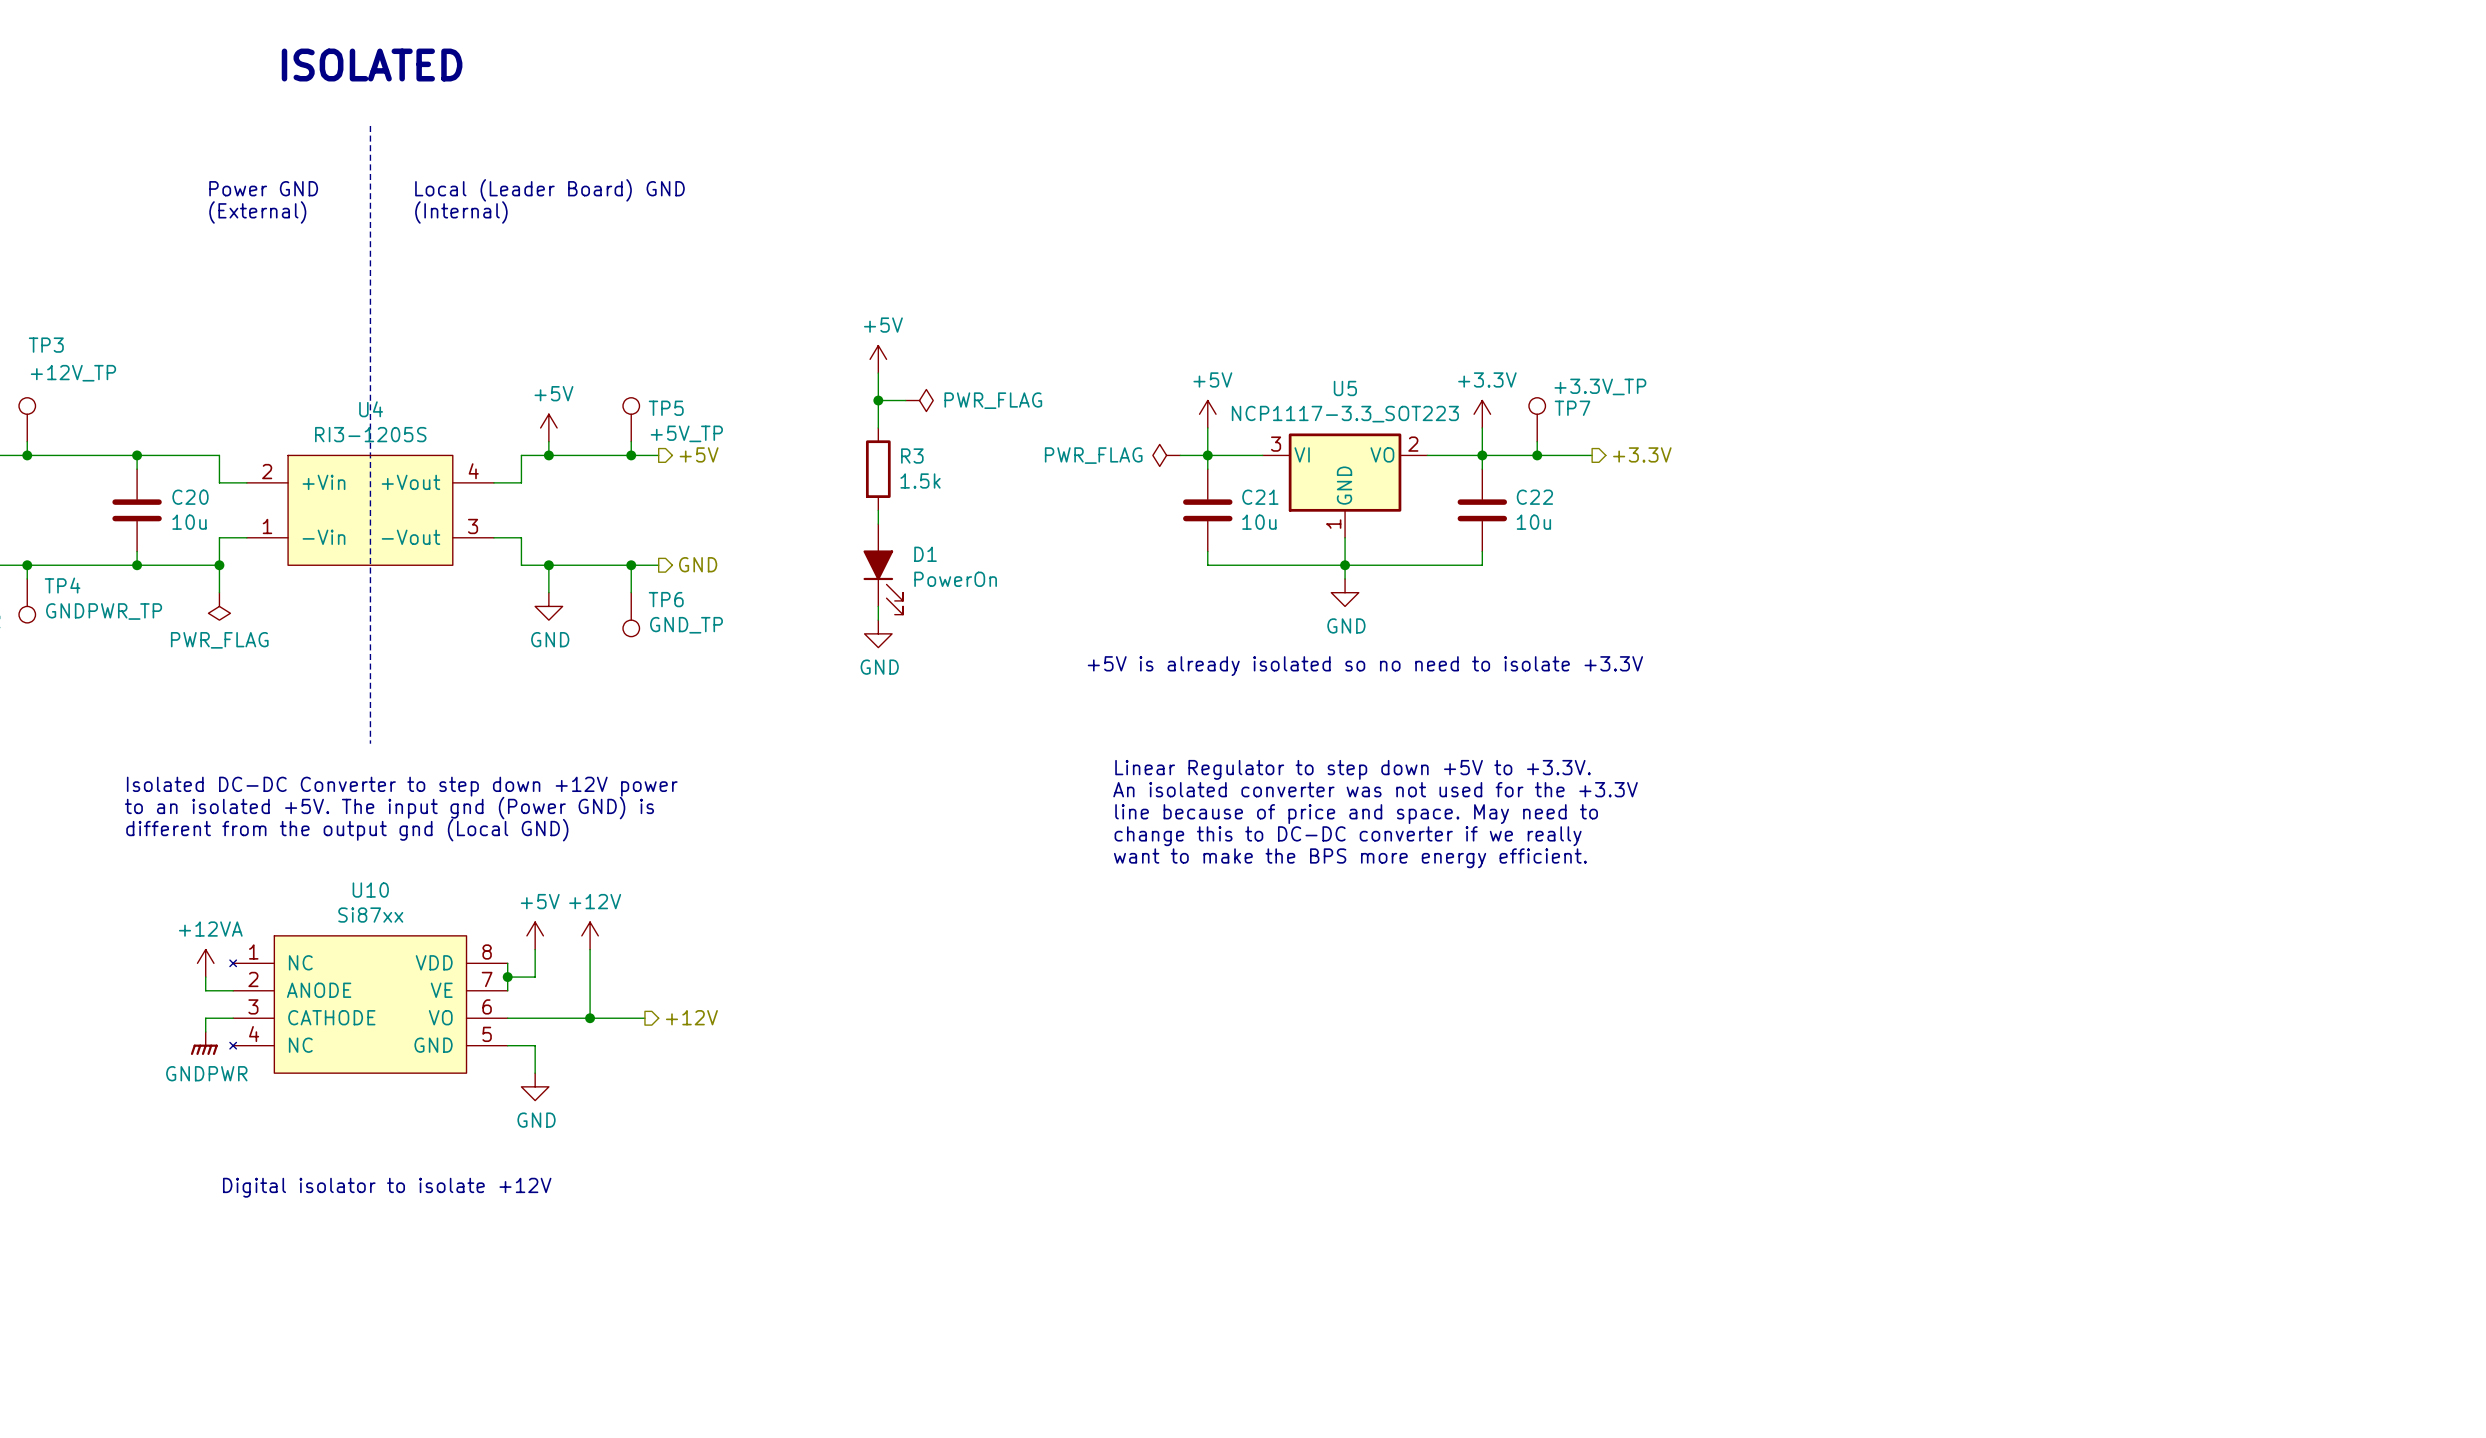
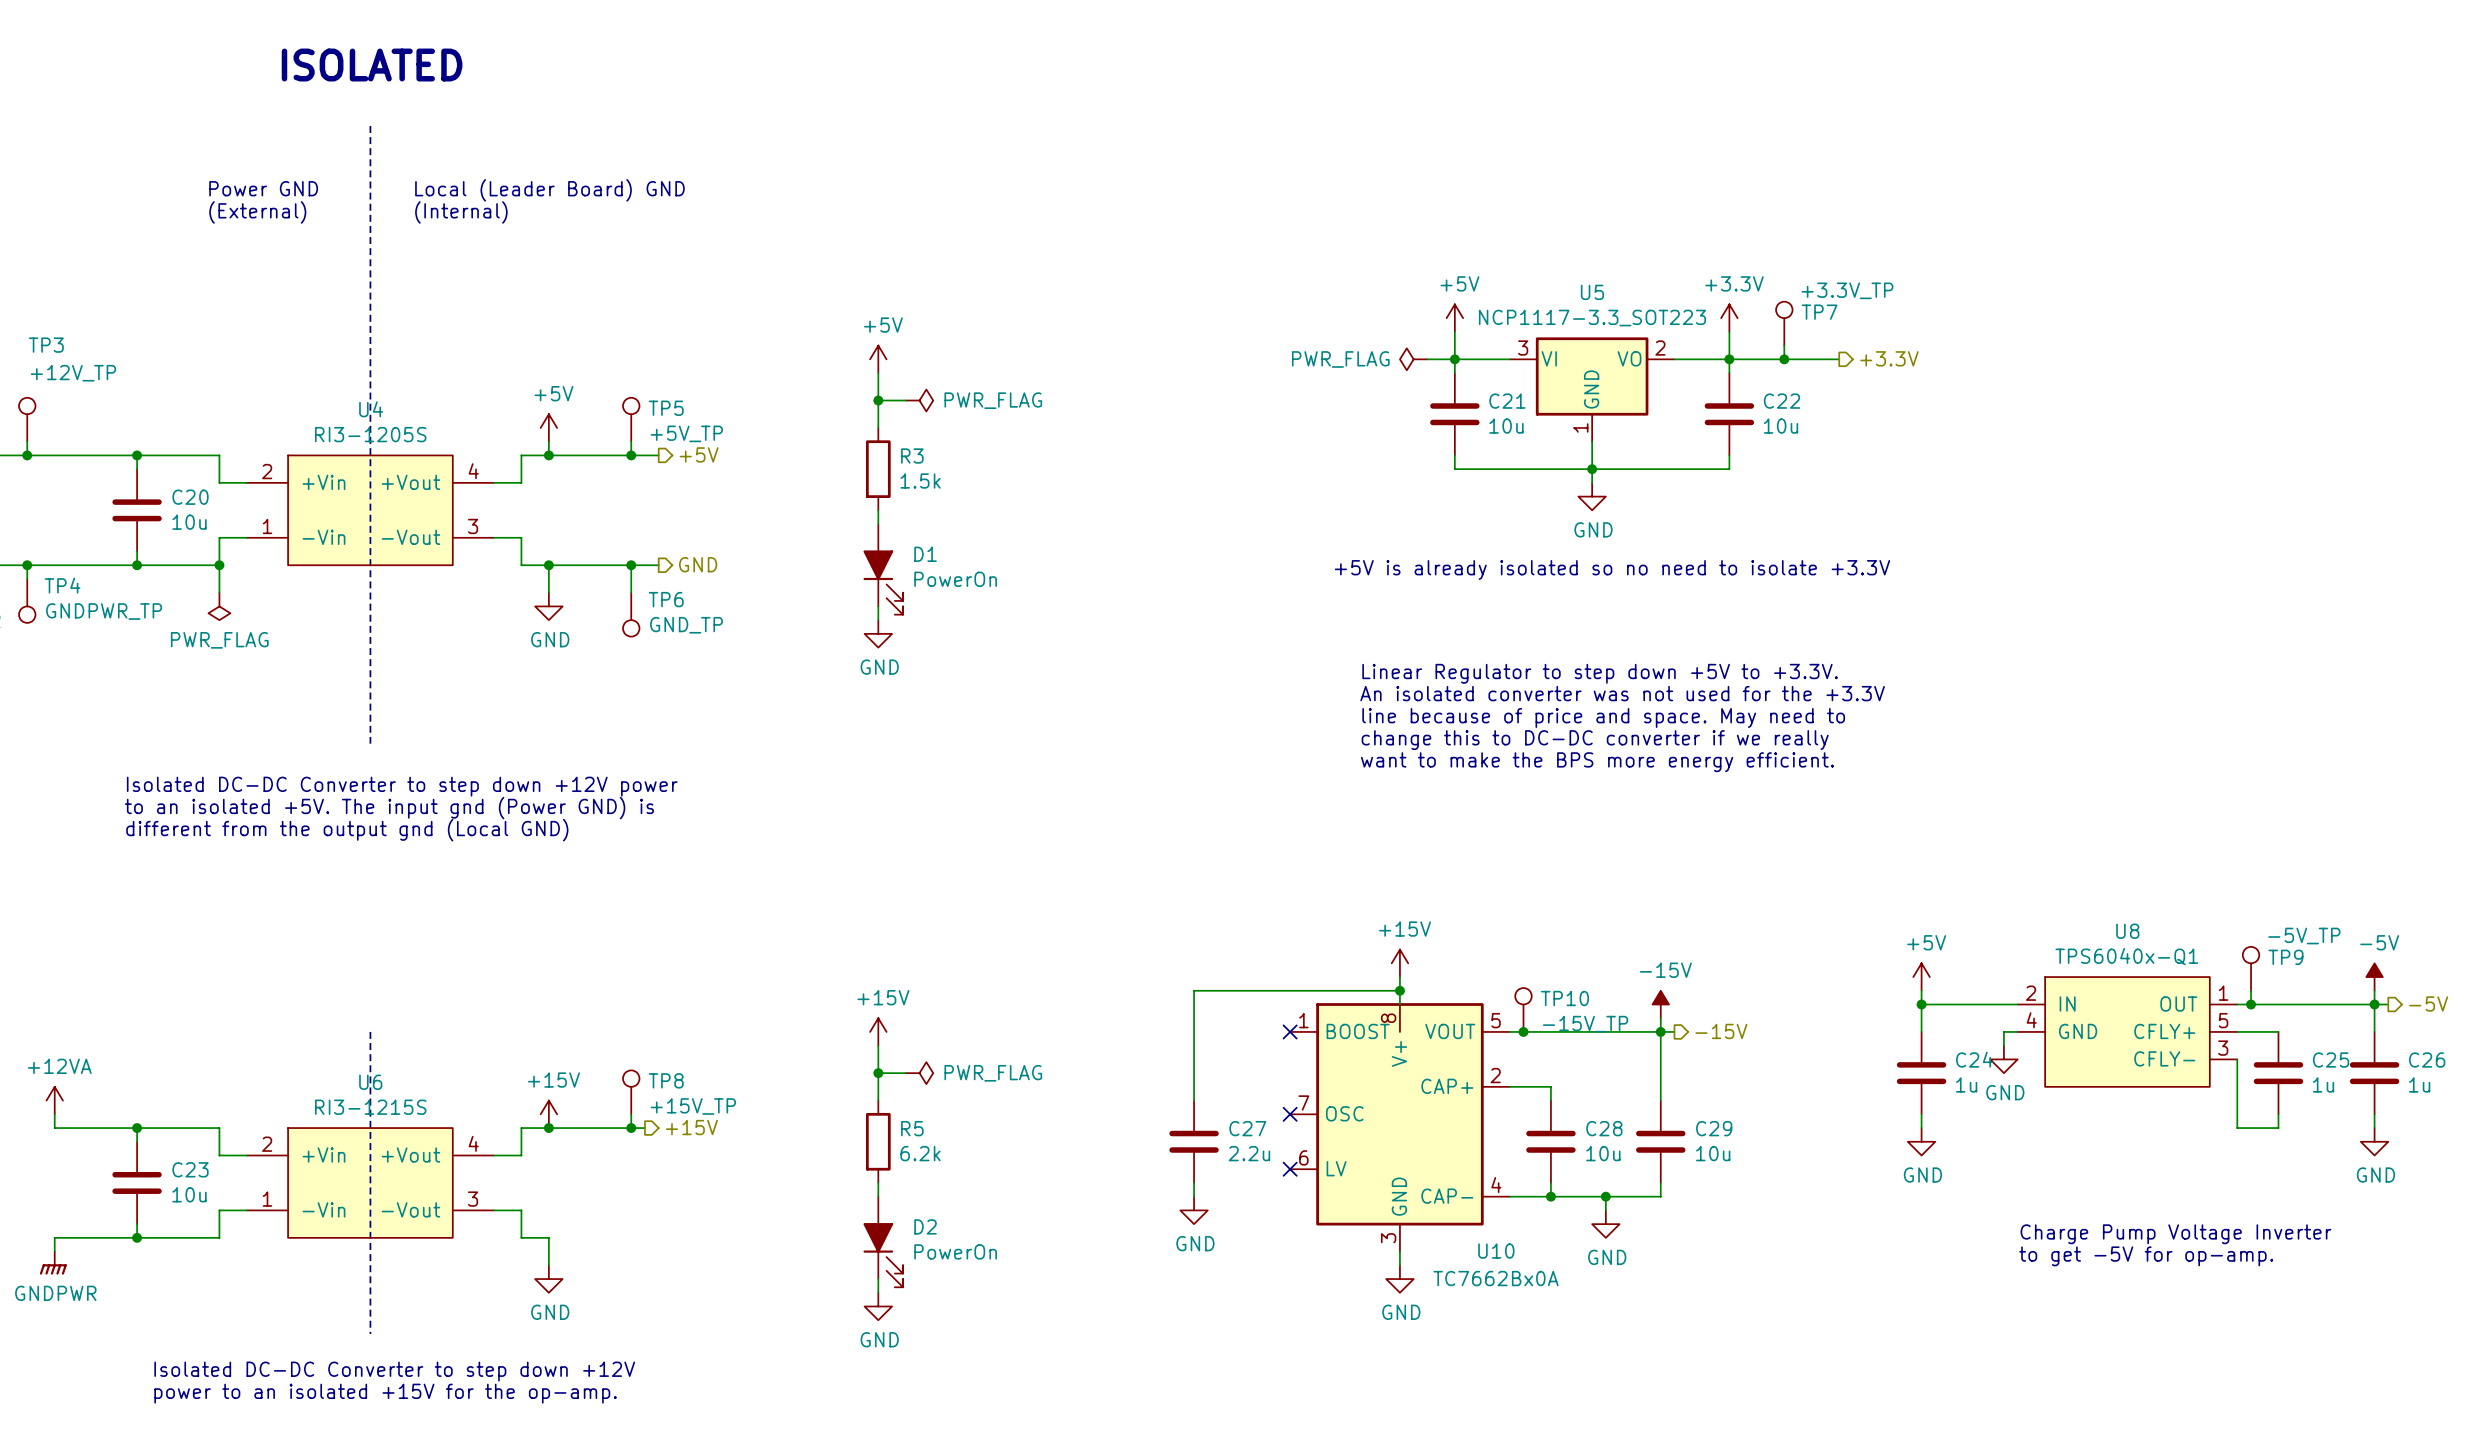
junction: none -> (1454, 359)
junction: none -> (1729, 359)
junction: none -> (1784, 359)
power symbol position: +5V (1207, 414) -> +5V (1454, 318)
power symbol position: +3.3V (1482, 414) -> +3.3V (1729, 318)
TP7 position: (1537, 419) -> (1784, 323)
wire: (1207, 427) (1207, 469) -> (1454, 331) (1454, 373)
wire: (1482, 427) (1482, 469) -> (1729, 331) (1729, 373)
wire: (1537, 441) (1537, 455) -> (1784, 345) (1784, 359)
hierarchical label position: +3.3V (1642, 454) -> +3.3V (1889, 358)
power symbol position: PWR_FLAG (1166, 455) -> PWR_FLAG (1413, 359)
wire: (1180, 455) (1262, 455) -> (1427, 359) (1509, 359)
junction: (1207, 455) -> none
wire: (1427, 455) (1592, 455) -> (1674, 359) (1839, 359)
junction: (1482, 455) -> none
junction: (1537, 455) -> none
junction: none -> (1592, 469)
U5 position: (1345, 485) -> (1592, 389)
C21 position: (1207, 510) -> (1454, 414)
C22 position: (1482, 510) -> (1729, 414)
wire: (1345, 537) (1345, 578) -> (1592, 441) (1592, 482)
wire: (1207, 551) (1207, 565) (1482, 565) (1482, 551) -> (1454, 455) (1454, 469) (1729, 469) (1729, 455)
junction: (1345, 565) -> none
power symbol position: GND (1345, 592) -> GND (1592, 496)
text position: +5V is already isolated so no need to isolate +3.3V (1365, 666) -> +5V is already isolated so no need to isolate +3.3V (1612, 570)
text position: Linear Regulator to step down +5V to +3.3V. (1352, 769) -> Linear Regulator to step down +5V to +3.3V. (1600, 673)
text position: An isolated converter was not used for the +3.3V (1375, 789) -> An isolated converter was not used for the +3.3V (1622, 693)
text position: line because of price and space. May need to (1356, 814) -> line because of price and space. May need to (1603, 717)
text position: change this to DC-DC converter if we really (1348, 836) -> change this to DC-DC converter if we really (1595, 740)
text position: want to make the BPS more energy efficient. (1350, 858) -> want to make the BPS more energy efficient. (1597, 762)
U10 name position: U10 (370, 890) -> U10 (1496, 1251)
U10 value: Si87xx (370, 915) -> TC7662Bx0A (1496, 1278)
U10 symbol: [229, 935, 508, 1074] -> [1290, 1003, 1510, 1252]
power symbol: +5V (535, 935) -> none
power symbol: +12V (590, 935) -> none
wire: (535, 949) (535, 977) (507, 977) -> none
wire: (590, 949) (590, 1018) -> none
power symbol position: +12VA (205, 963) -> +12VA (54, 1100)
wire: (507, 963) (507, 990) -> none
power symbol: none -> +15V (1399, 963)
TP9: none -> -5V_TP (2251, 968)
wire: (205, 977) (205, 990) (233, 990) -> none
junction: (507, 977) -> none
wire: none -> (1399, 977) (1399, 1004)
power symbol: none -> +5V (1921, 977)
power symbol: none -> -5V (2374, 977)
wire: none -> (1399, 990) (1194, 990) (1194, 1100)
junction: none -> (1399, 990)
wire: none -> (1921, 990) (1921, 1031)
wire: none -> (2251, 990) (2251, 1004)
wire: none -> (2374, 990) (2374, 1031)
hierarchical label: none -> -5V (2428, 1003)
power symbol: none -> -15V (1660, 1004)
wire: none -> (1921, 1004) (2017, 1004)
junction: none -> (1921, 1004)
wire: none -> (2237, 1004) (2388, 1004)
junction: none -> (2251, 1004)
junction: none -> (2374, 1004)
TP10: none -> -15V_TP (1523, 1009)
hierarchical label: +12V (691, 1017) -> none
wire: (233, 1018) (205, 1018) (205, 1031) -> none
wire: (507, 1018) (644, 1018) -> none
junction: (590, 1018) -> none
wire: none -> (1660, 1018) (1660, 1100)
line: none -> (370, 1031) (370, 1333)
power symbol: none -> +15V (878, 1031)
no-connect mark: none -> (1290, 1031)
wire: none -> (1509, 1031) (1674, 1031)
junction: none -> (1523, 1031)
junction: none -> (1660, 1031)
hierarchical label: none -> -15V (1721, 1031)
wire: none -> (2017, 1031) (2003, 1031) (2003, 1045)
U8: none -> TPS6040x-Q1 (2127, 1031)
wire: none -> (2237, 1031) (2278, 1031)
power symbol position: GNDPWR (204, 1043) -> GNDPWR (53, 1263)
wire: (507, 1045) (535, 1045) (535, 1073) -> none
wire: none -> (878, 1045) (878, 1100)
power symbol: none -> GND (2003, 1059)
wire: none -> (2237, 1059) (2237, 1128) (2278, 1128) (2278, 1114)
wire: none -> (878, 1073) (905, 1073)
junction: none -> (878, 1073)
power symbol: none -> PWR_FLAG (919, 1073)
C24: none -> 1u (1921, 1073)
C25: none -> 1u (2278, 1073)
C26: none -> 1u (2374, 1073)
power symbol position: GND (535, 1086) -> GND (548, 1279)
wire: none -> (1509, 1086) (1550, 1086) (1550, 1100)
TP8: none -> +15V_TP (631, 1092)
wire: none -> (54, 1114) (54, 1128) (219, 1128) (219, 1155) (246, 1155)
power symbol: none -> +15V (548, 1114)
wire: none -> (631, 1114) (631, 1128)
no-connect mark: none -> (1290, 1114)
wire: none -> (1921, 1114) (1921, 1128)
wire: none -> (2374, 1114) (2374, 1128)
hierarchical label: none -> +15V (691, 1127)
wire: none -> (137, 1128) (137, 1141)
junction: none -> (137, 1128)
junction: none -> (548, 1128)
junction: none -> (631, 1128)
wire: none -> (644, 1128) (521, 1128) (521, 1155) (493, 1155)
R5: none -> 6.2k (878, 1141)
C27: none -> 2.2u (1194, 1141)
C28: none -> 10u (1550, 1141)
C29: none -> 10u (1660, 1141)
power symbol: none -> GND (1921, 1141)
power symbol: none -> GND (2374, 1141)
no-connect mark: none -> (1290, 1169)
C23: none -> 10u (137, 1182)
U6: none -> RI3-1215S (370, 1182)
wire: none -> (878, 1182) (878, 1196)
wire: none -> (1194, 1182) (1194, 1196)
wire: none -> (1550, 1182) (1550, 1196)
wire: none -> (1660, 1182) (1660, 1196) (1509, 1196)
text: Digital isolator to isolate +12V (387, 1187) -> none
junction: none -> (1550, 1196)
wire: none -> (1605, 1196) (1605, 1210)
junction: none -> (1605, 1196)
wire: none -> (246, 1210) (219, 1210) (219, 1237) (54, 1237) (54, 1251)
wire: none -> (493, 1210) (521, 1210) (521, 1237) (548, 1237) (548, 1265)
power symbol: none -> GND (1194, 1210)
wire: none -> (137, 1224) (137, 1237)
power symbol: none -> GND (1605, 1224)
text: none -> Charge Pump Voltage Inverter (2175, 1234)
junction: none -> (137, 1237)
D2: none -> PowerOn (883, 1241)
wire: none -> (1399, 1251) (1399, 1265)
text: none -> to get -5V for op-amp. (2146, 1256)
wire: none -> (878, 1279) (878, 1292)
power symbol: none -> GND (1399, 1279)
power symbol: none -> GND (878, 1306)
text: none -> Isolated DC-DC Converter to step down +12V (394, 1371)
text: none -> power to an isolated +15V for the op-amp. (385, 1393)

